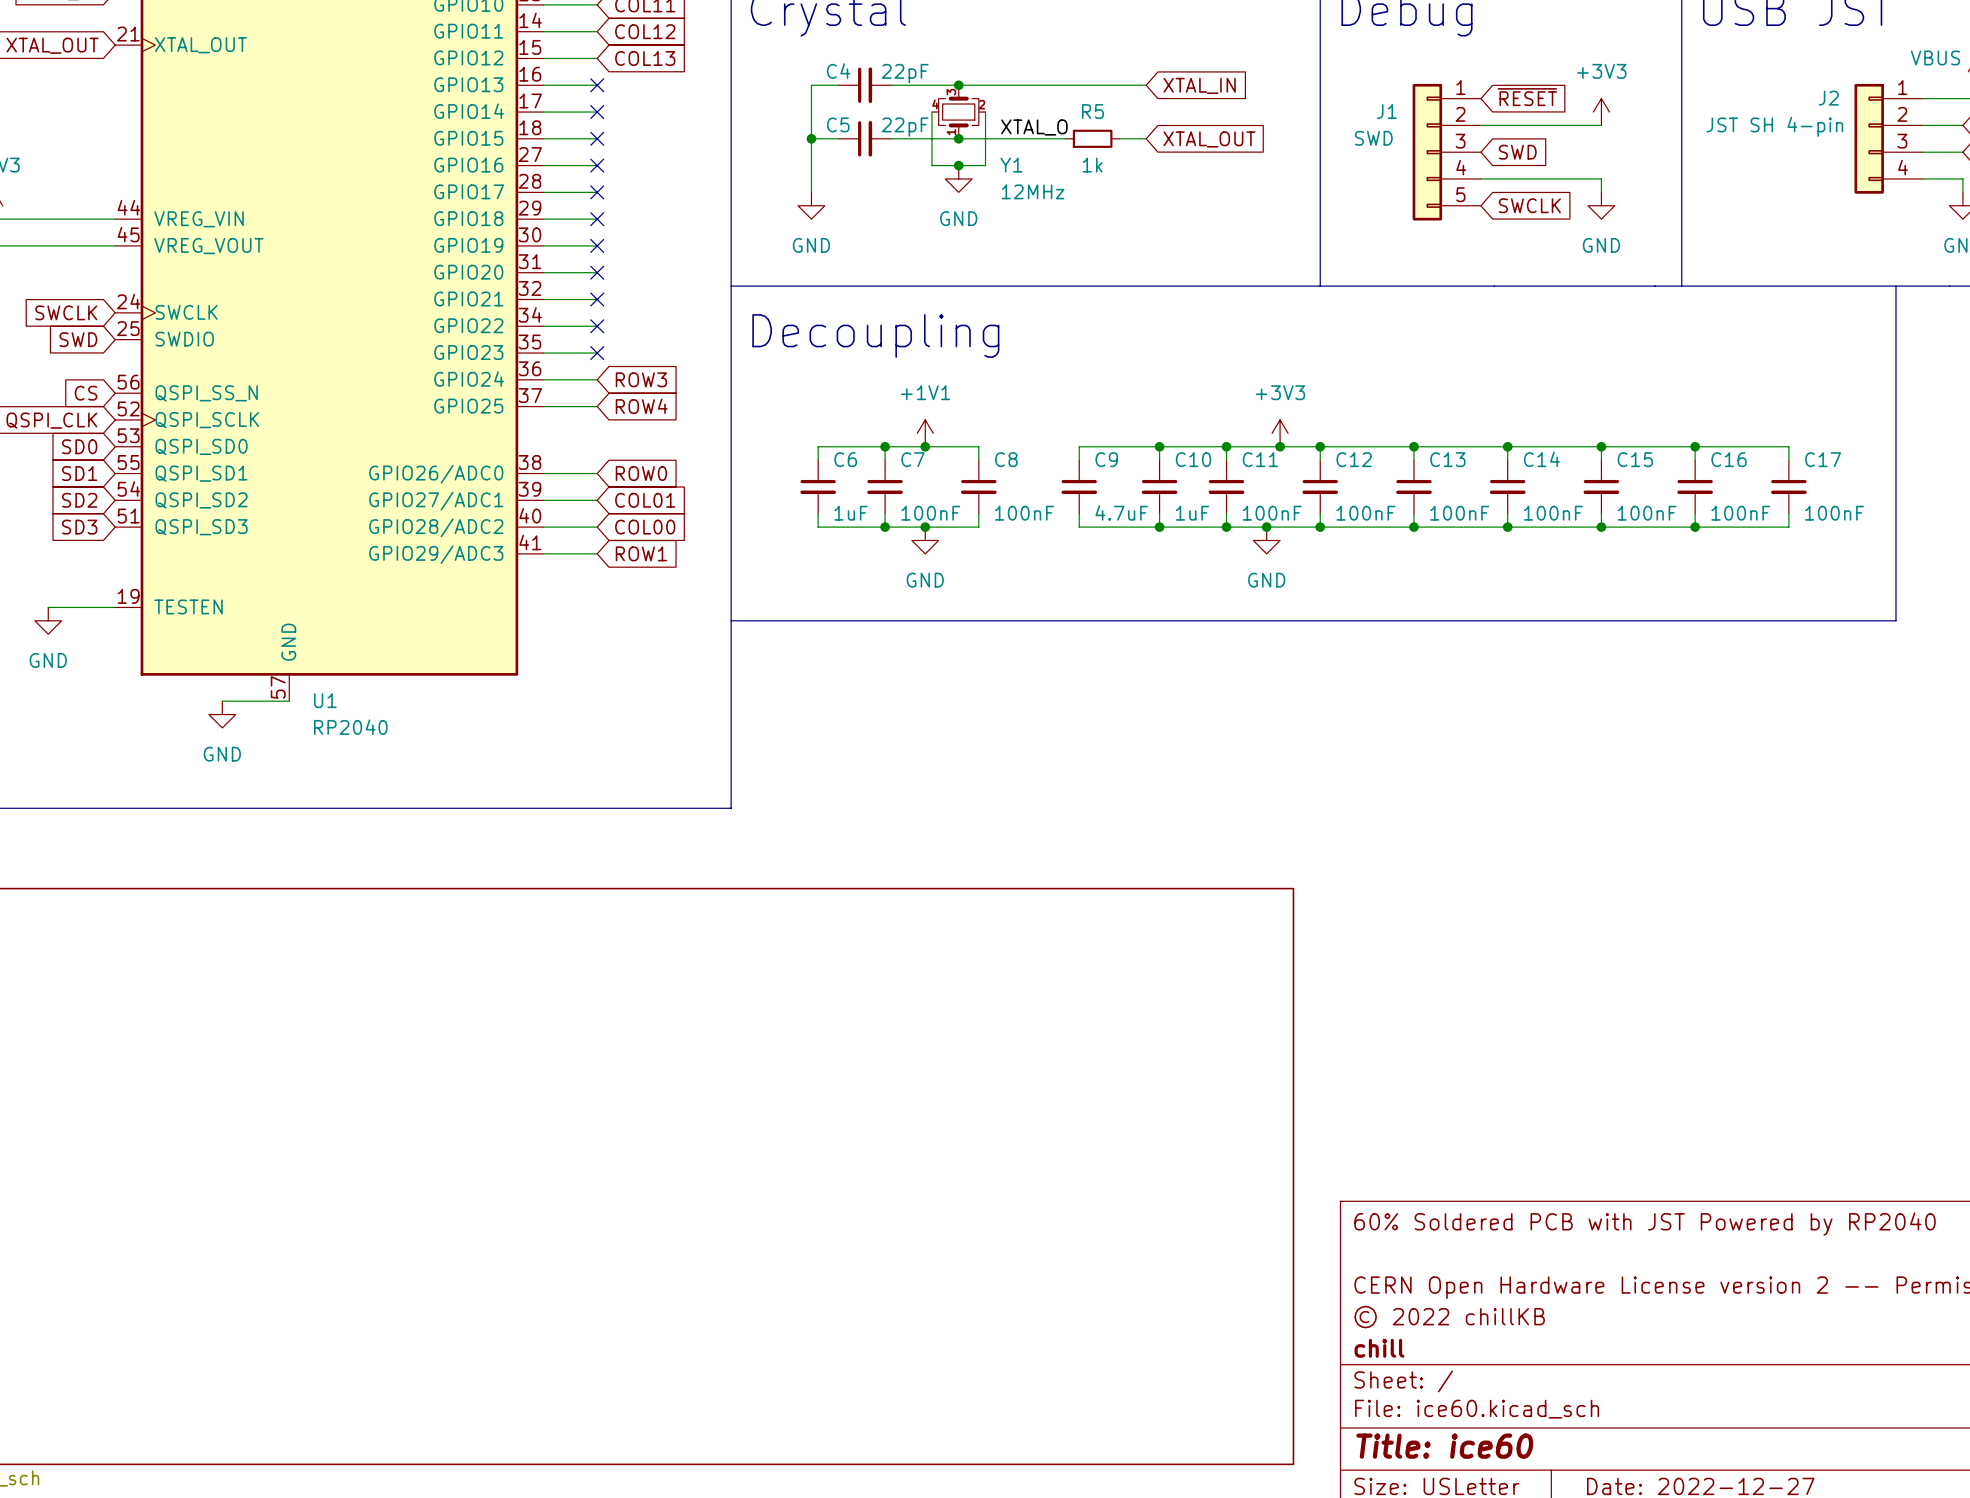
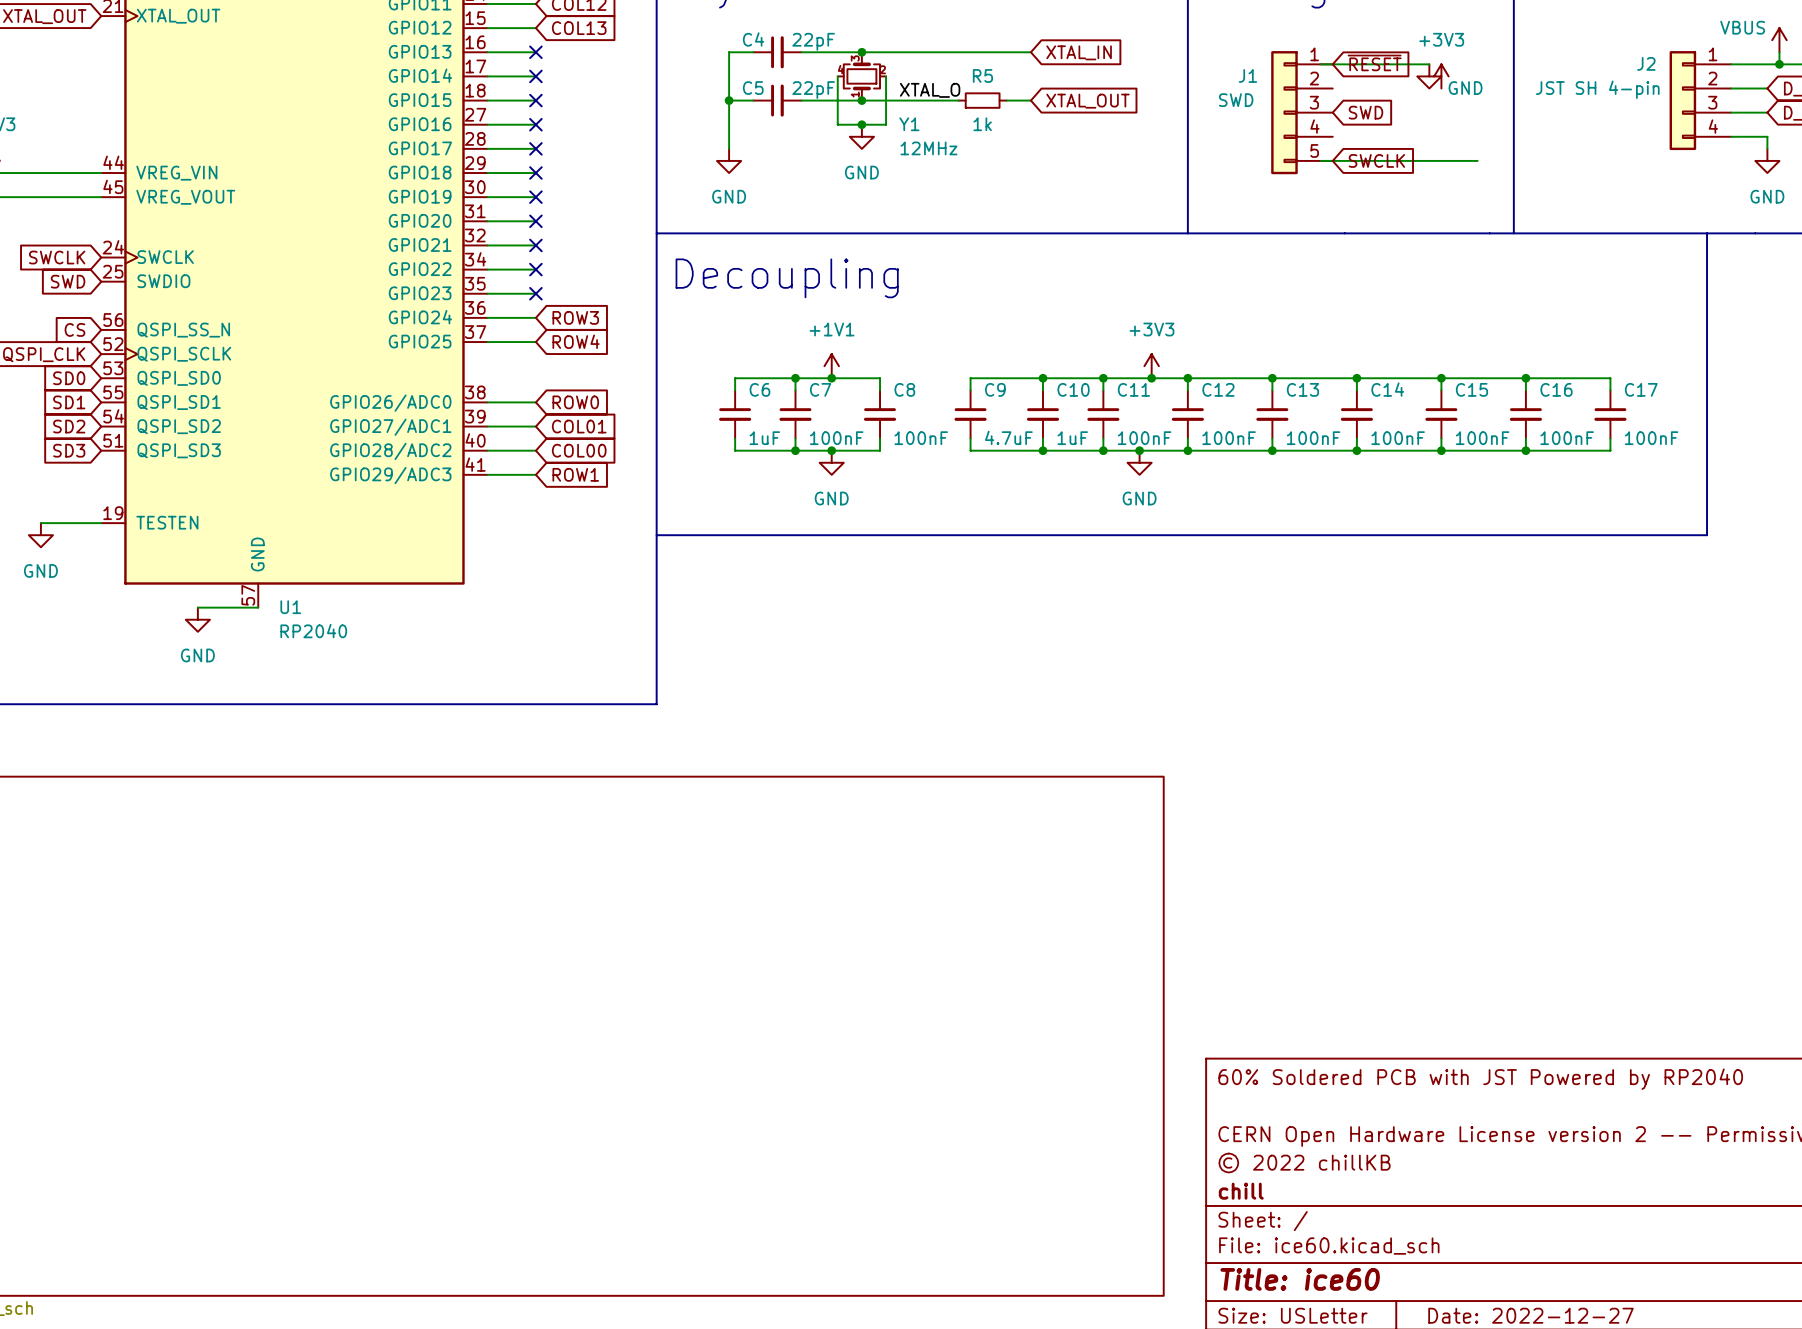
wire: (1480, 125) (1601, 125) -> (1320, 64) (1429, 64)
wire: (1480, 178) (1601, 178) (1601, 192) -> none
wire: none -> (1320, 160) (1477, 160)
power symbol position: GND (1601, 205) -> GND (1429, 76)
power symbol text position: GND (1601, 245) -> GND (1465, 88)

